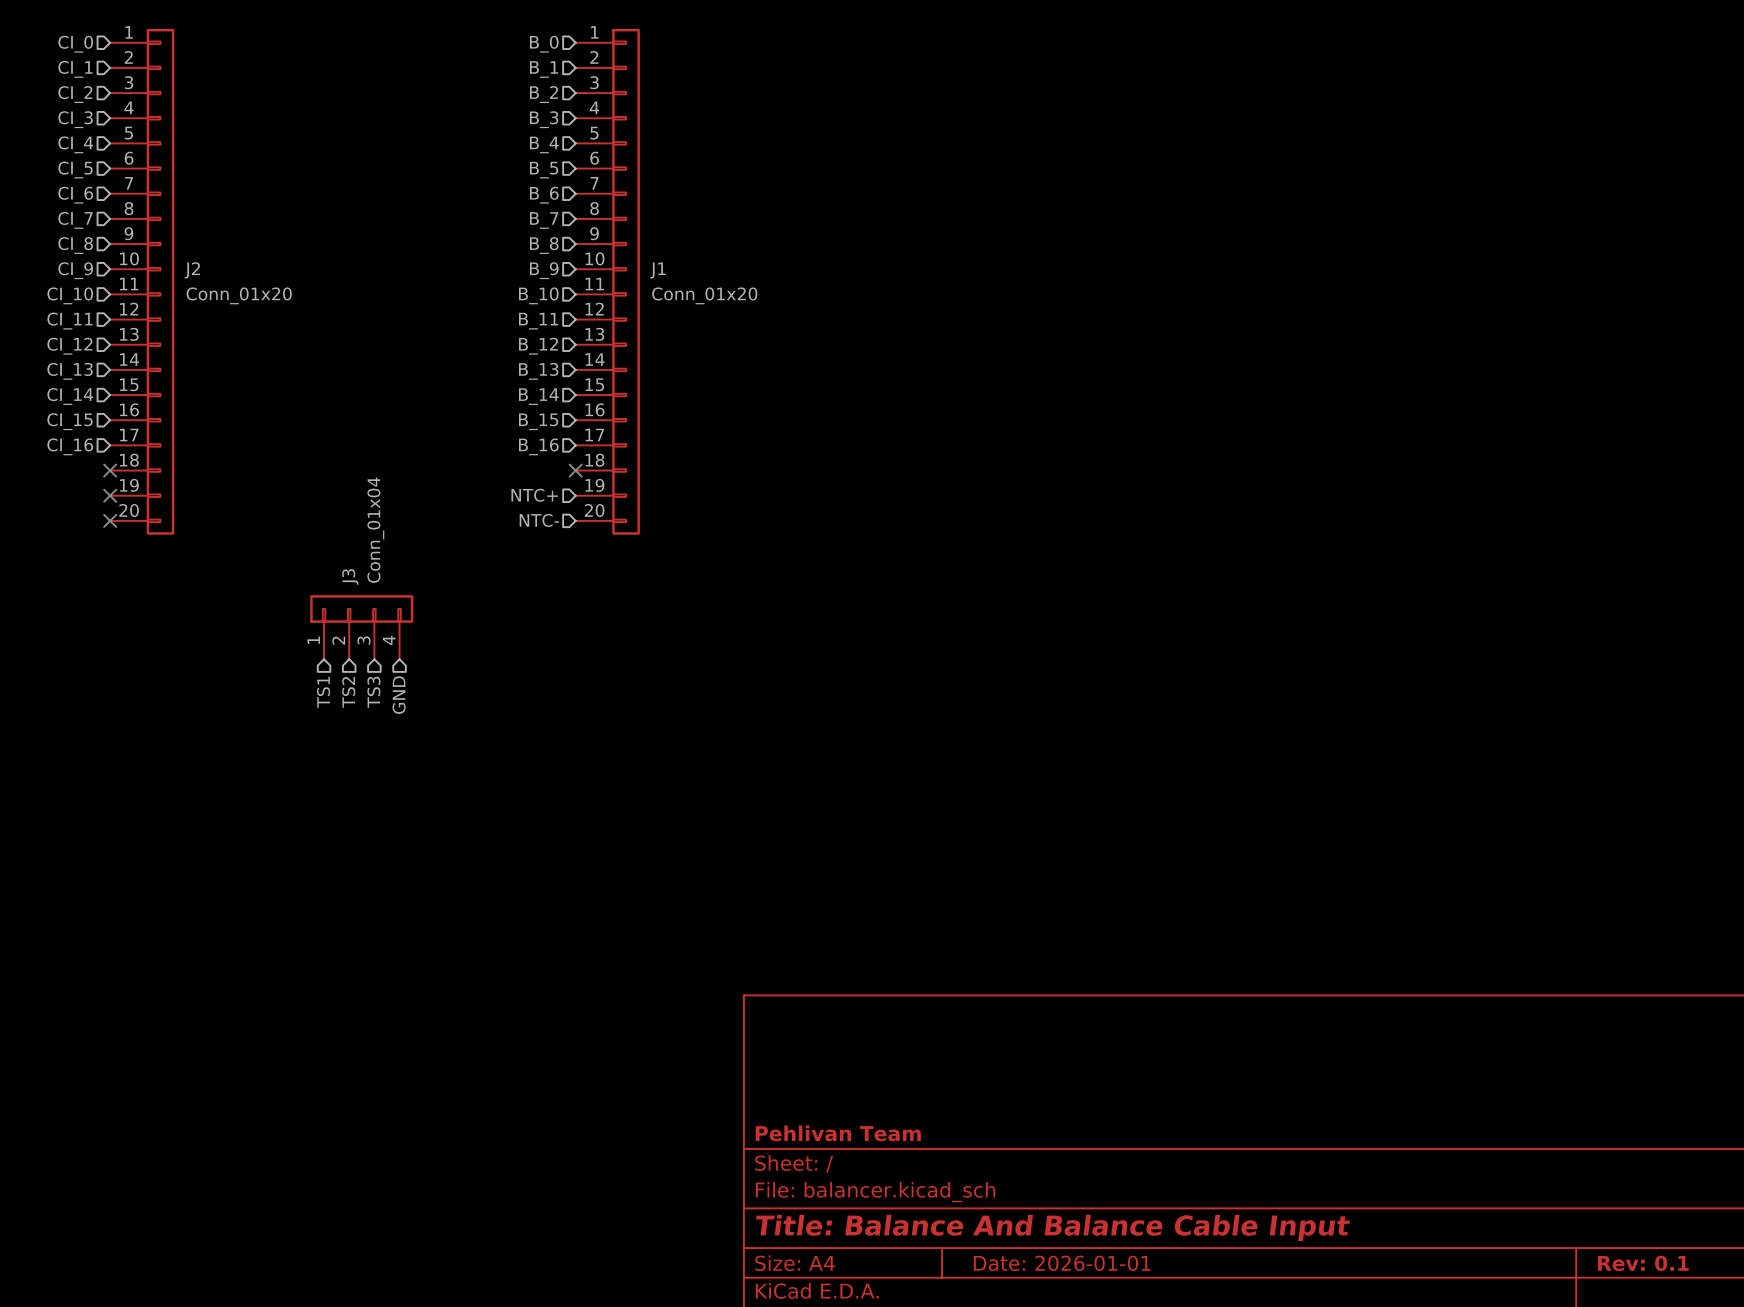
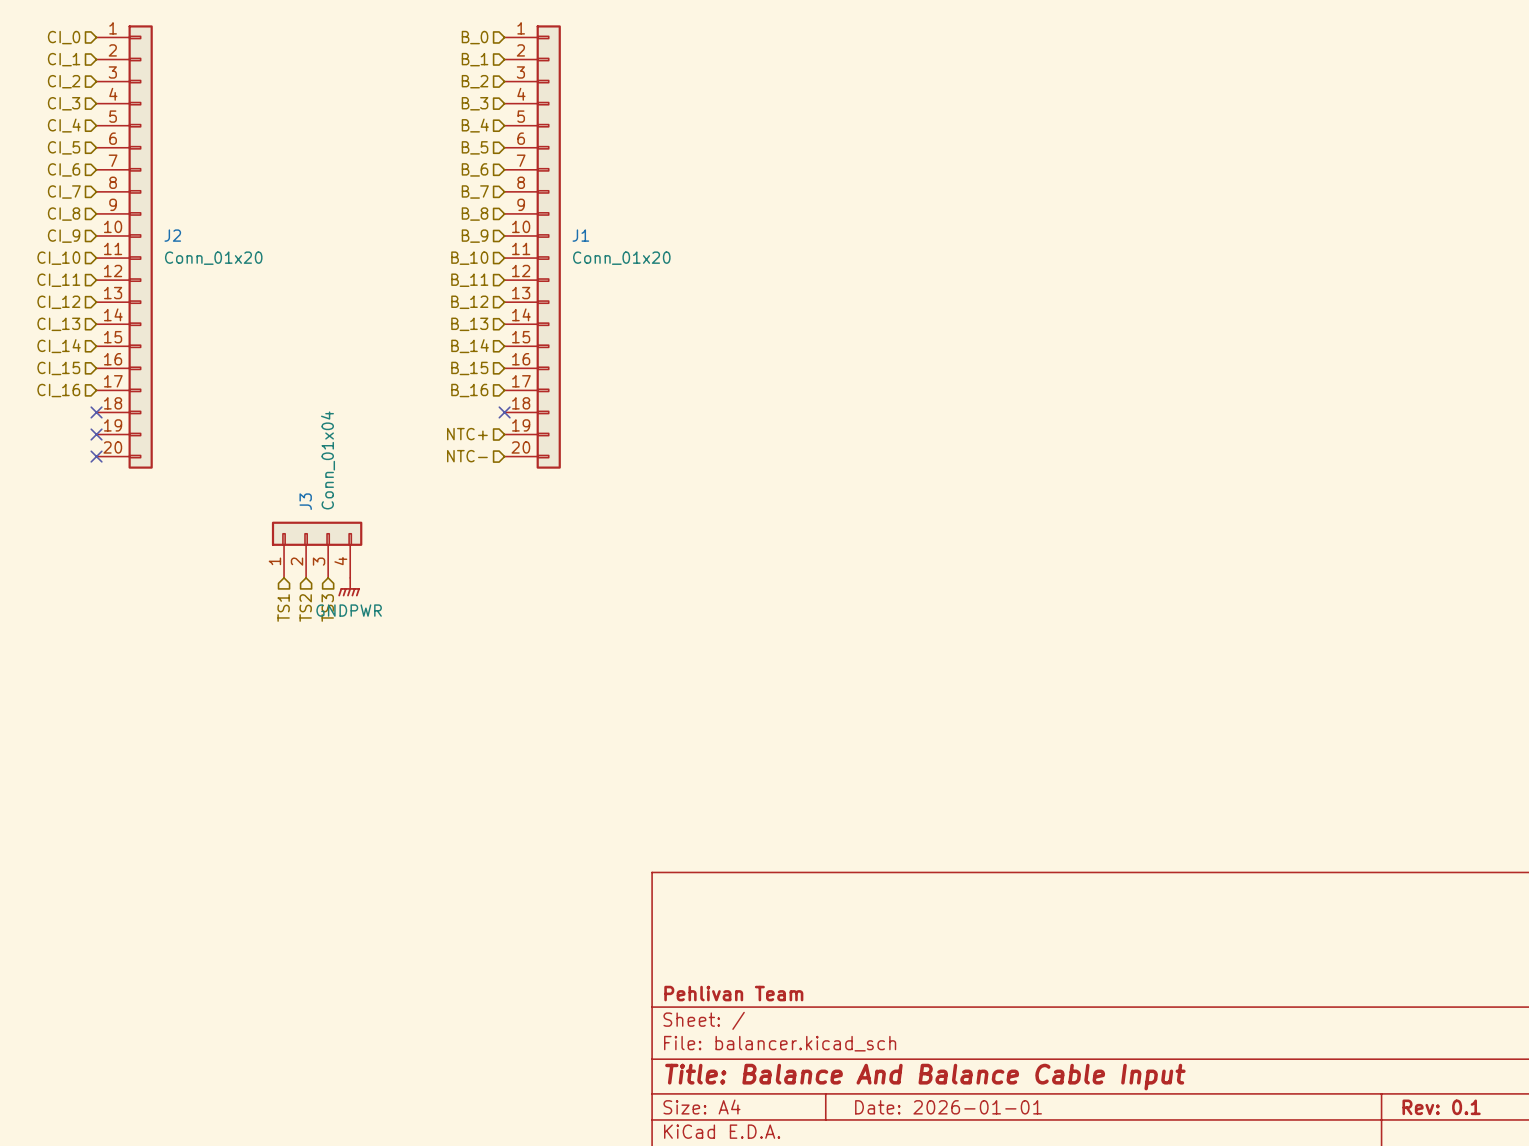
power symbol: none -> GNDPWR (349, 587)
hierarchical label: GND (399, 695) -> none

